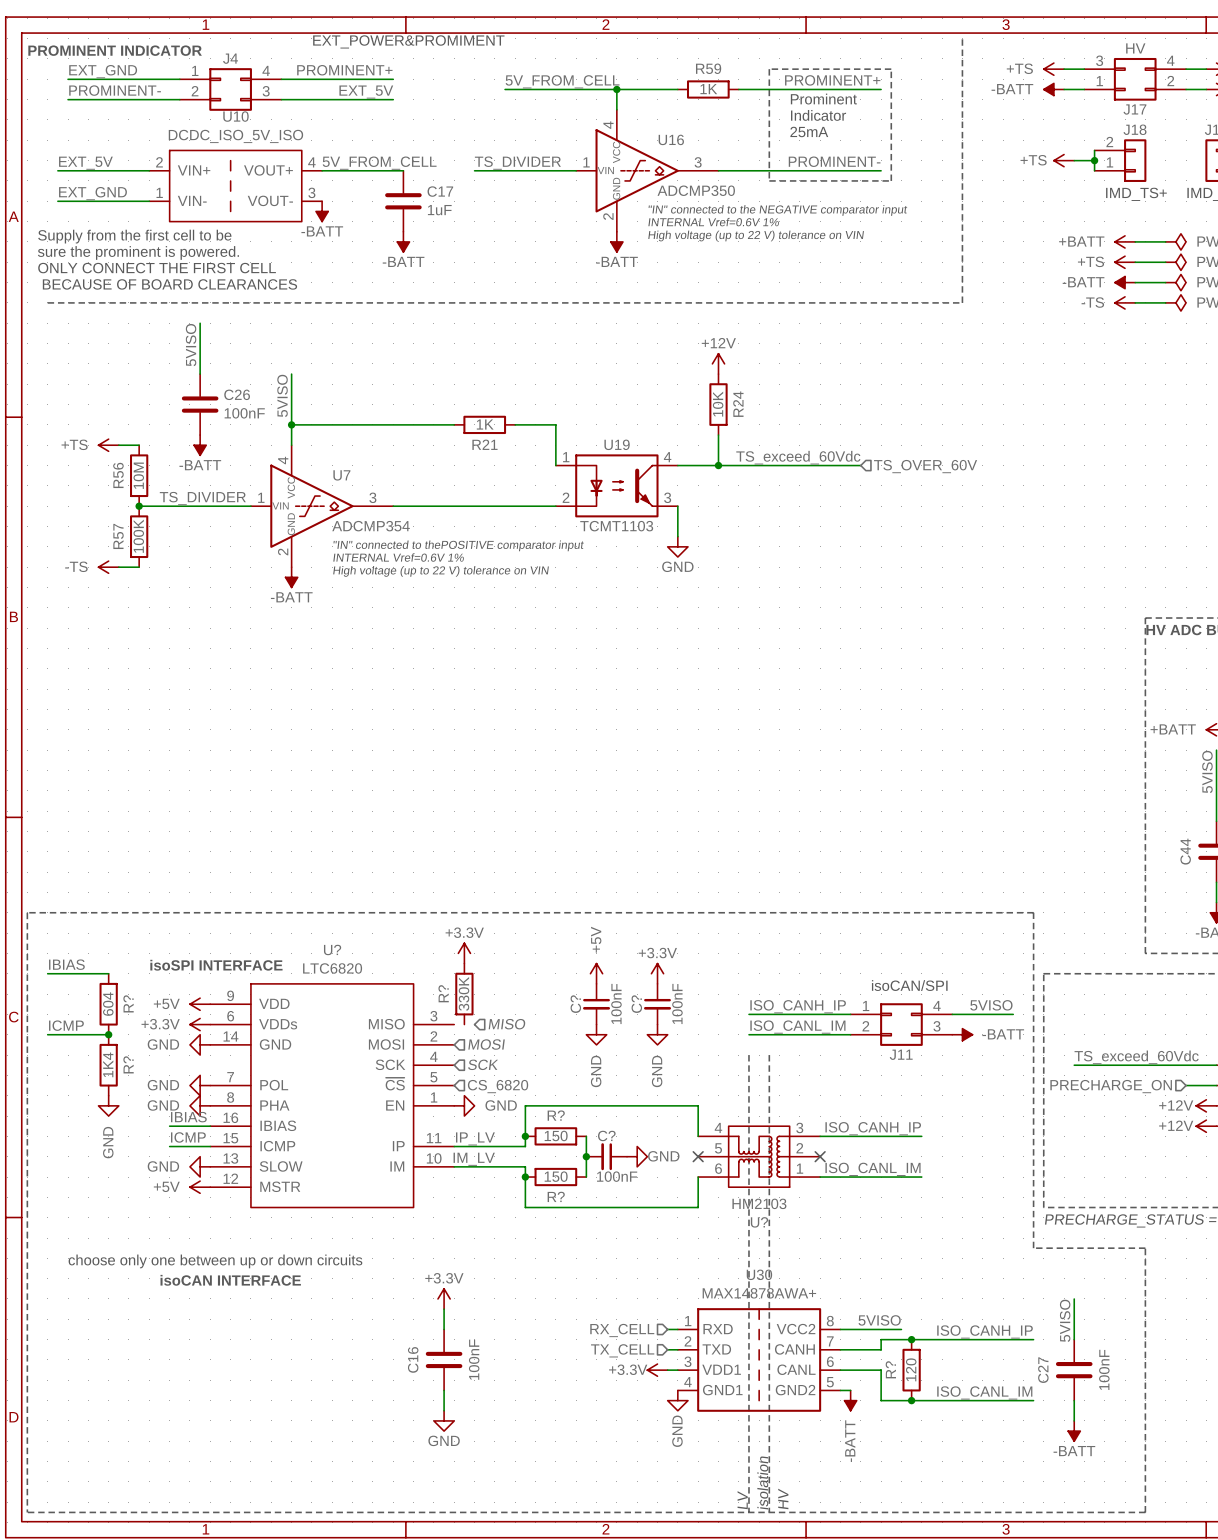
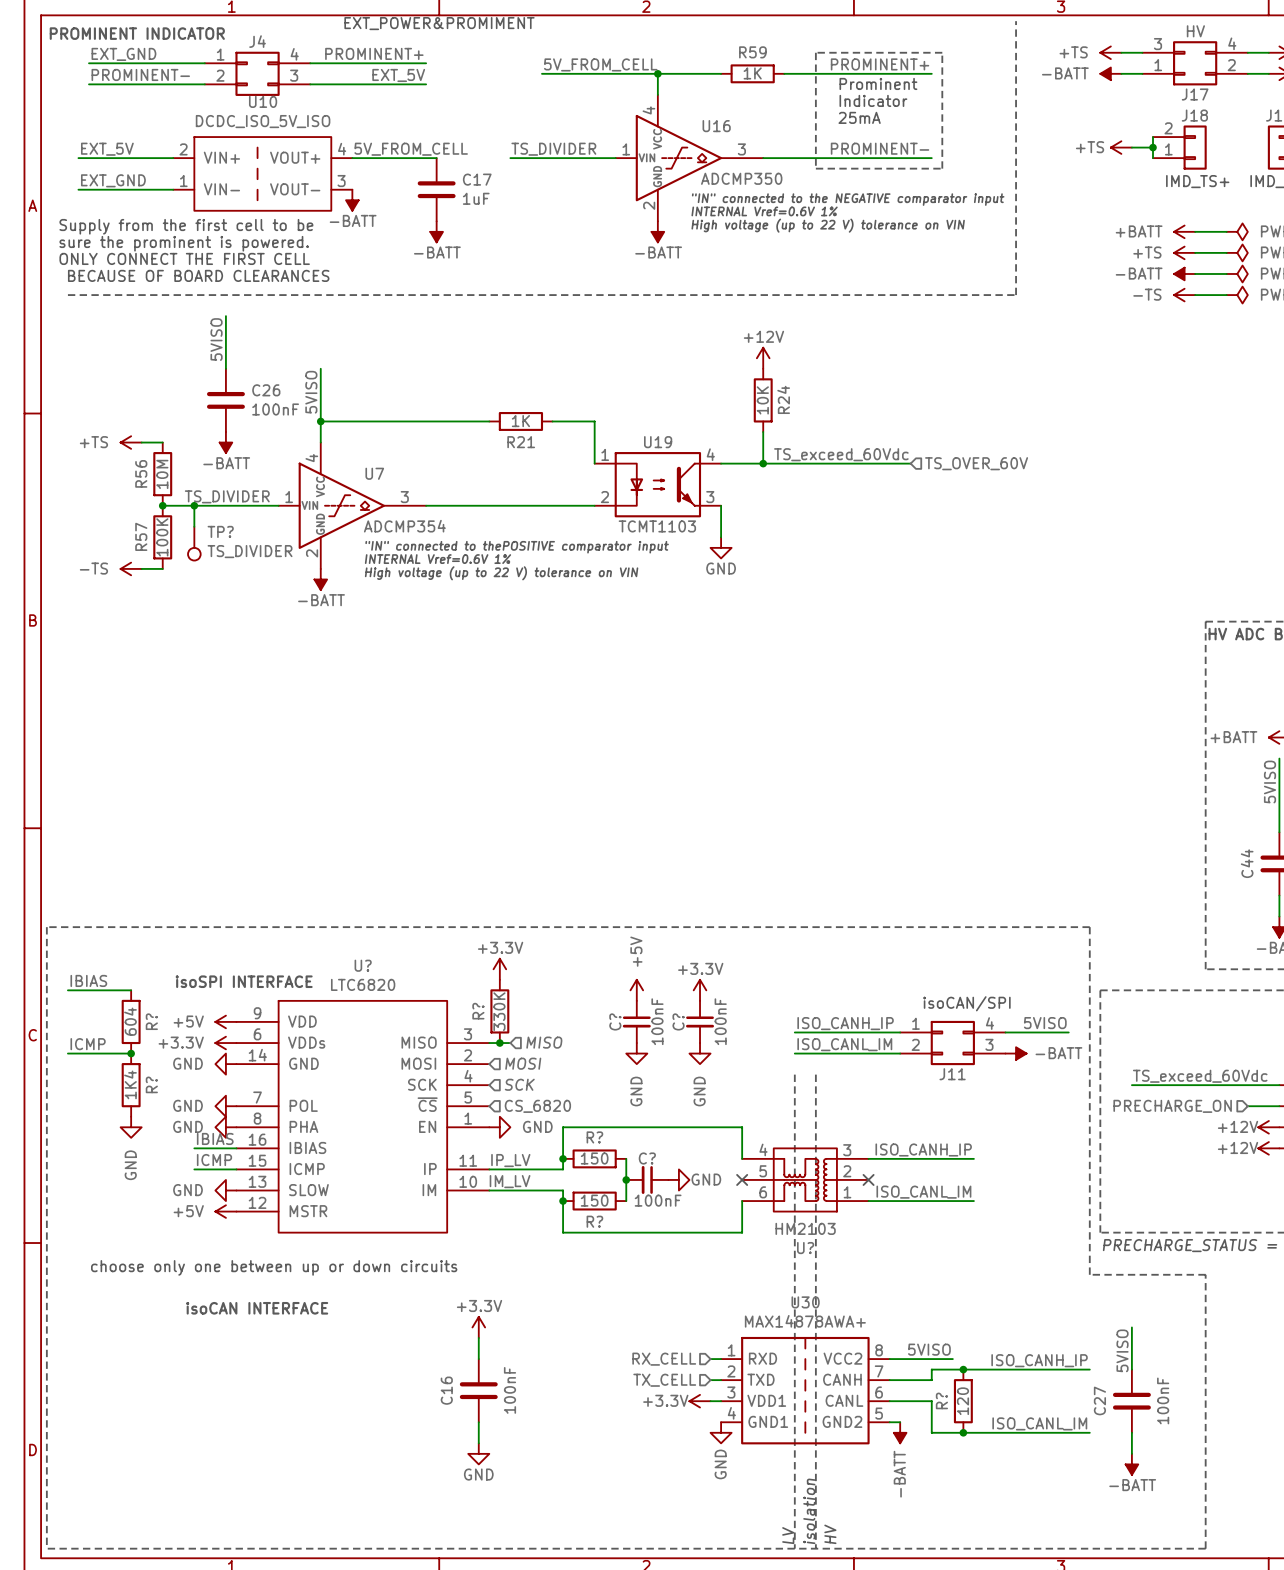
wire: none -> (194, 505) (194, 526)
junction: none -> (194, 505)
TP?: none -> TS_DIVIDER (194, 543)
wire: none -> (489, 1043) (510, 1043)
junction: none -> (499, 1043)
text position: choose only one between up or down circuits (215, 1261) -> choose only one between up or down circuits (274, 1267)

